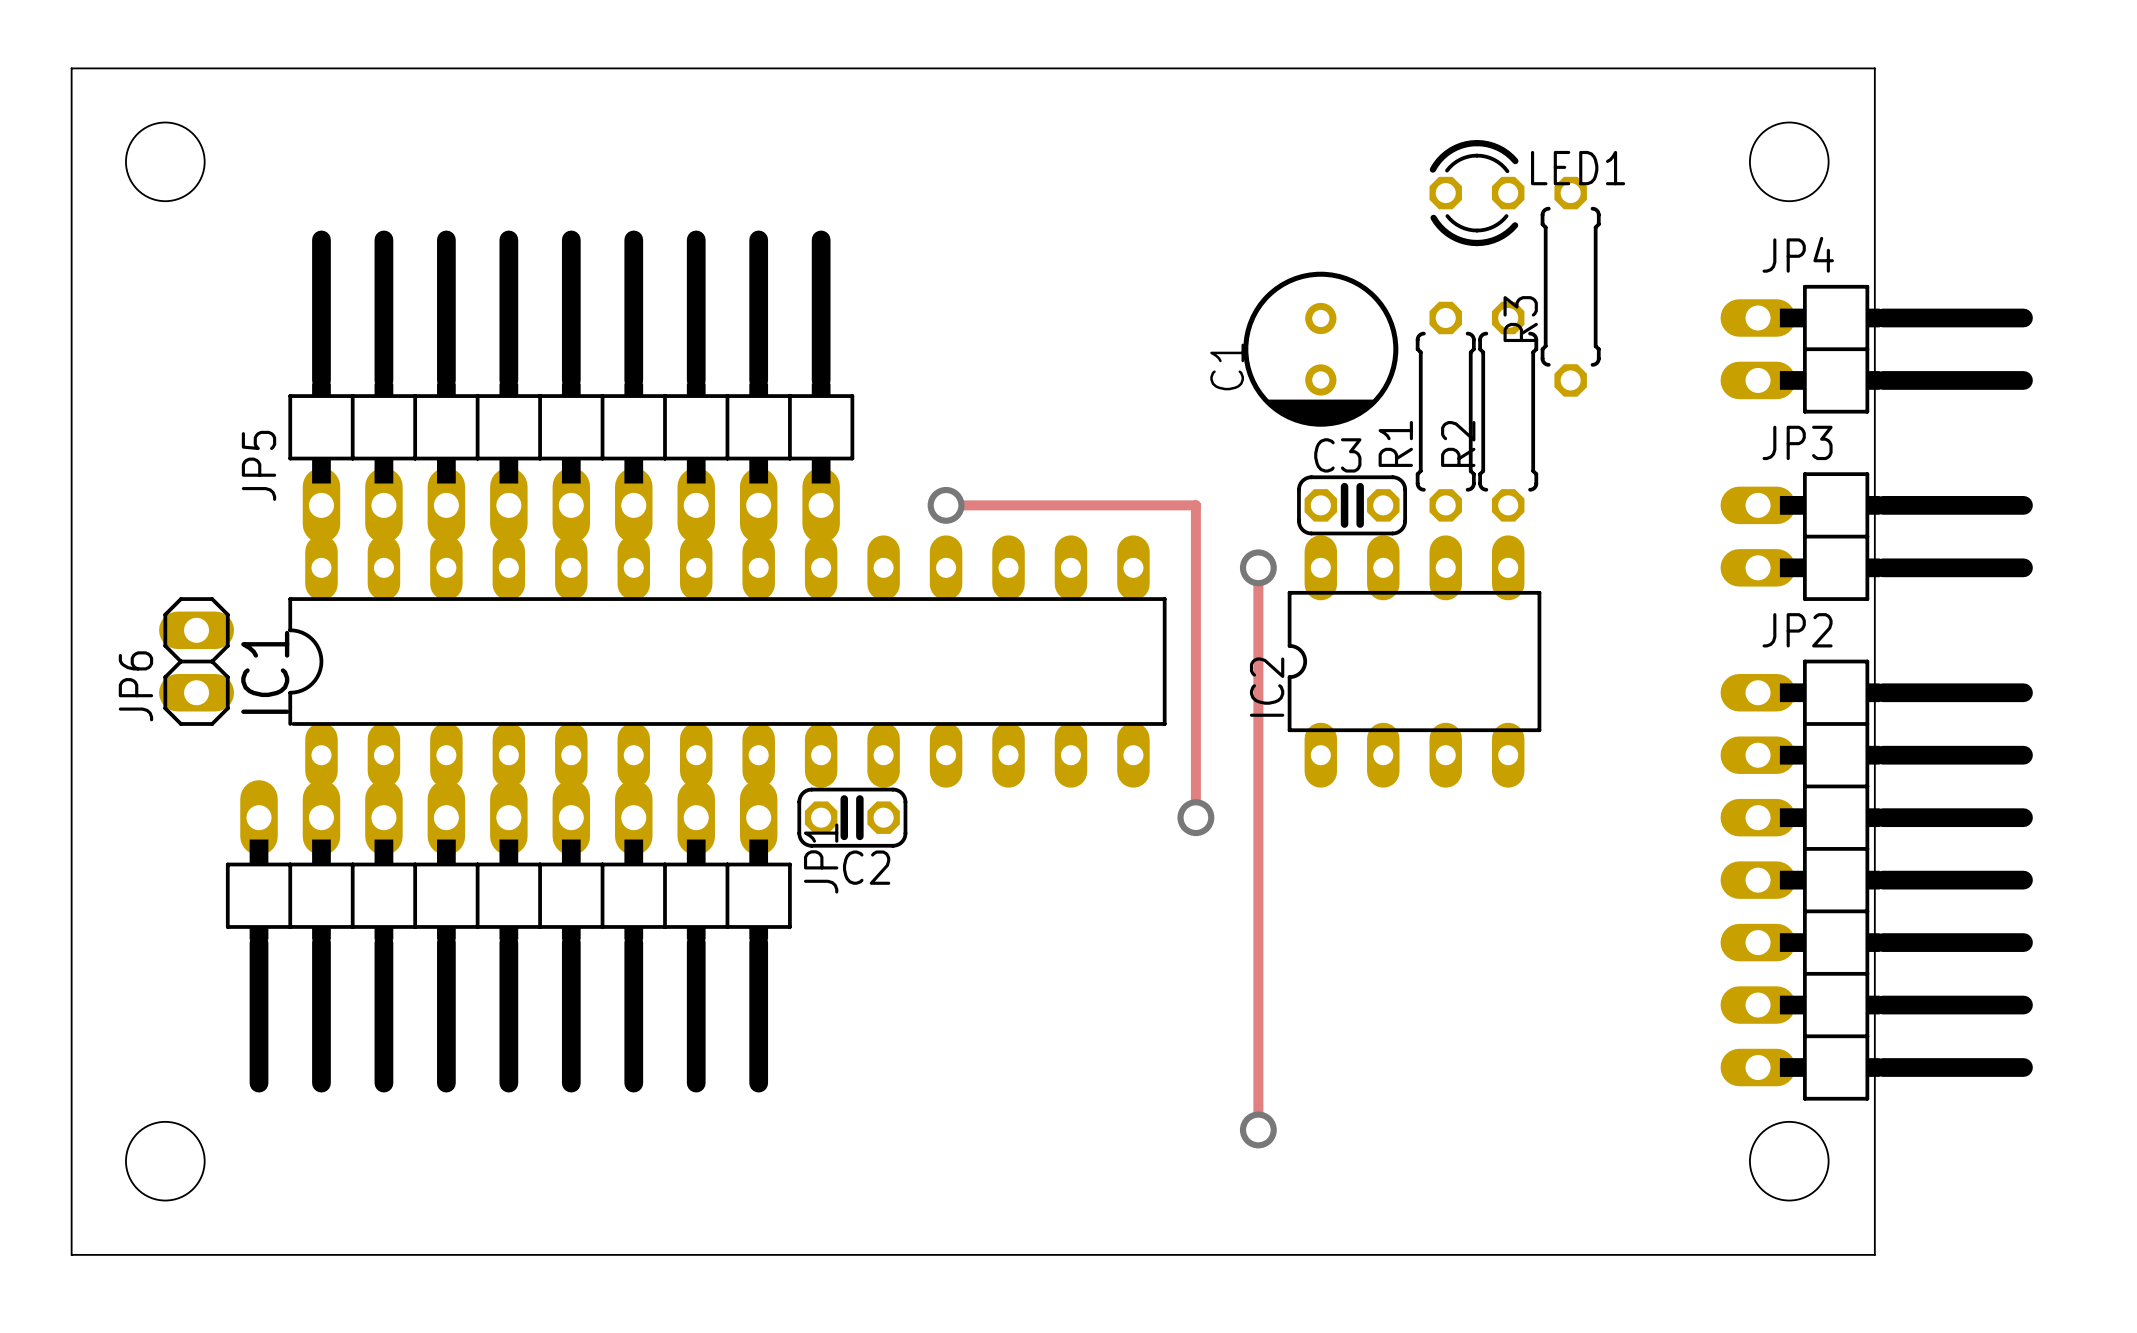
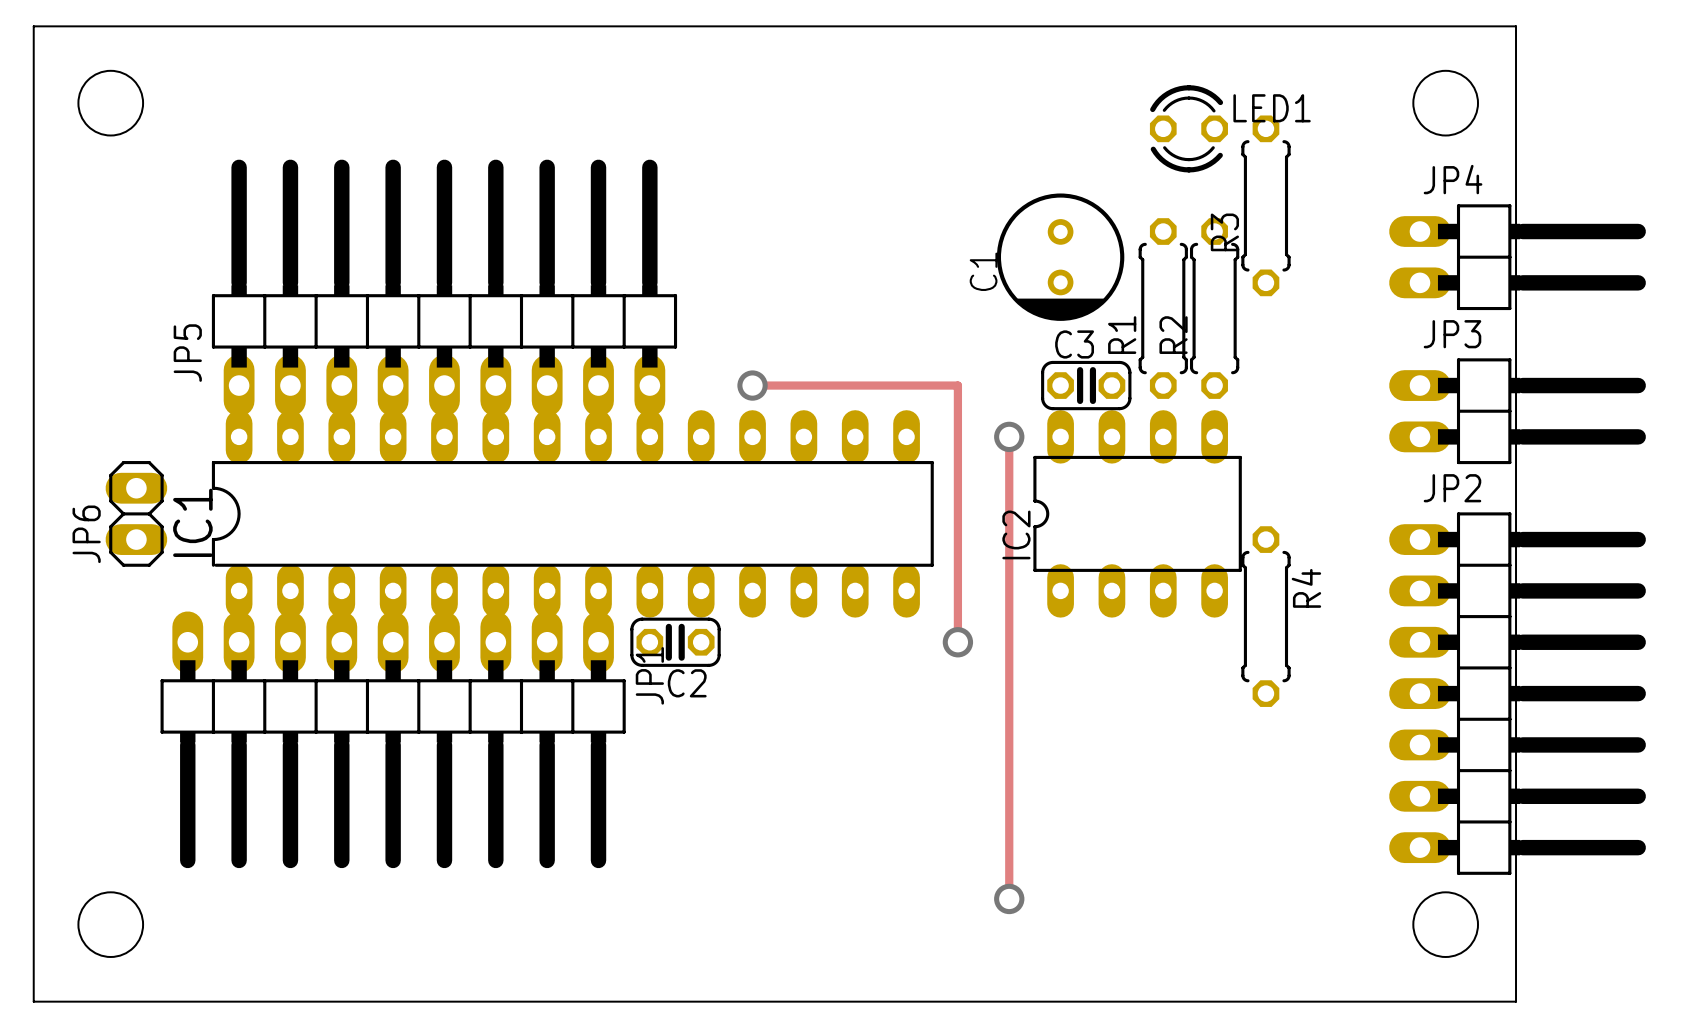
R4: none -> (1265, 616)

